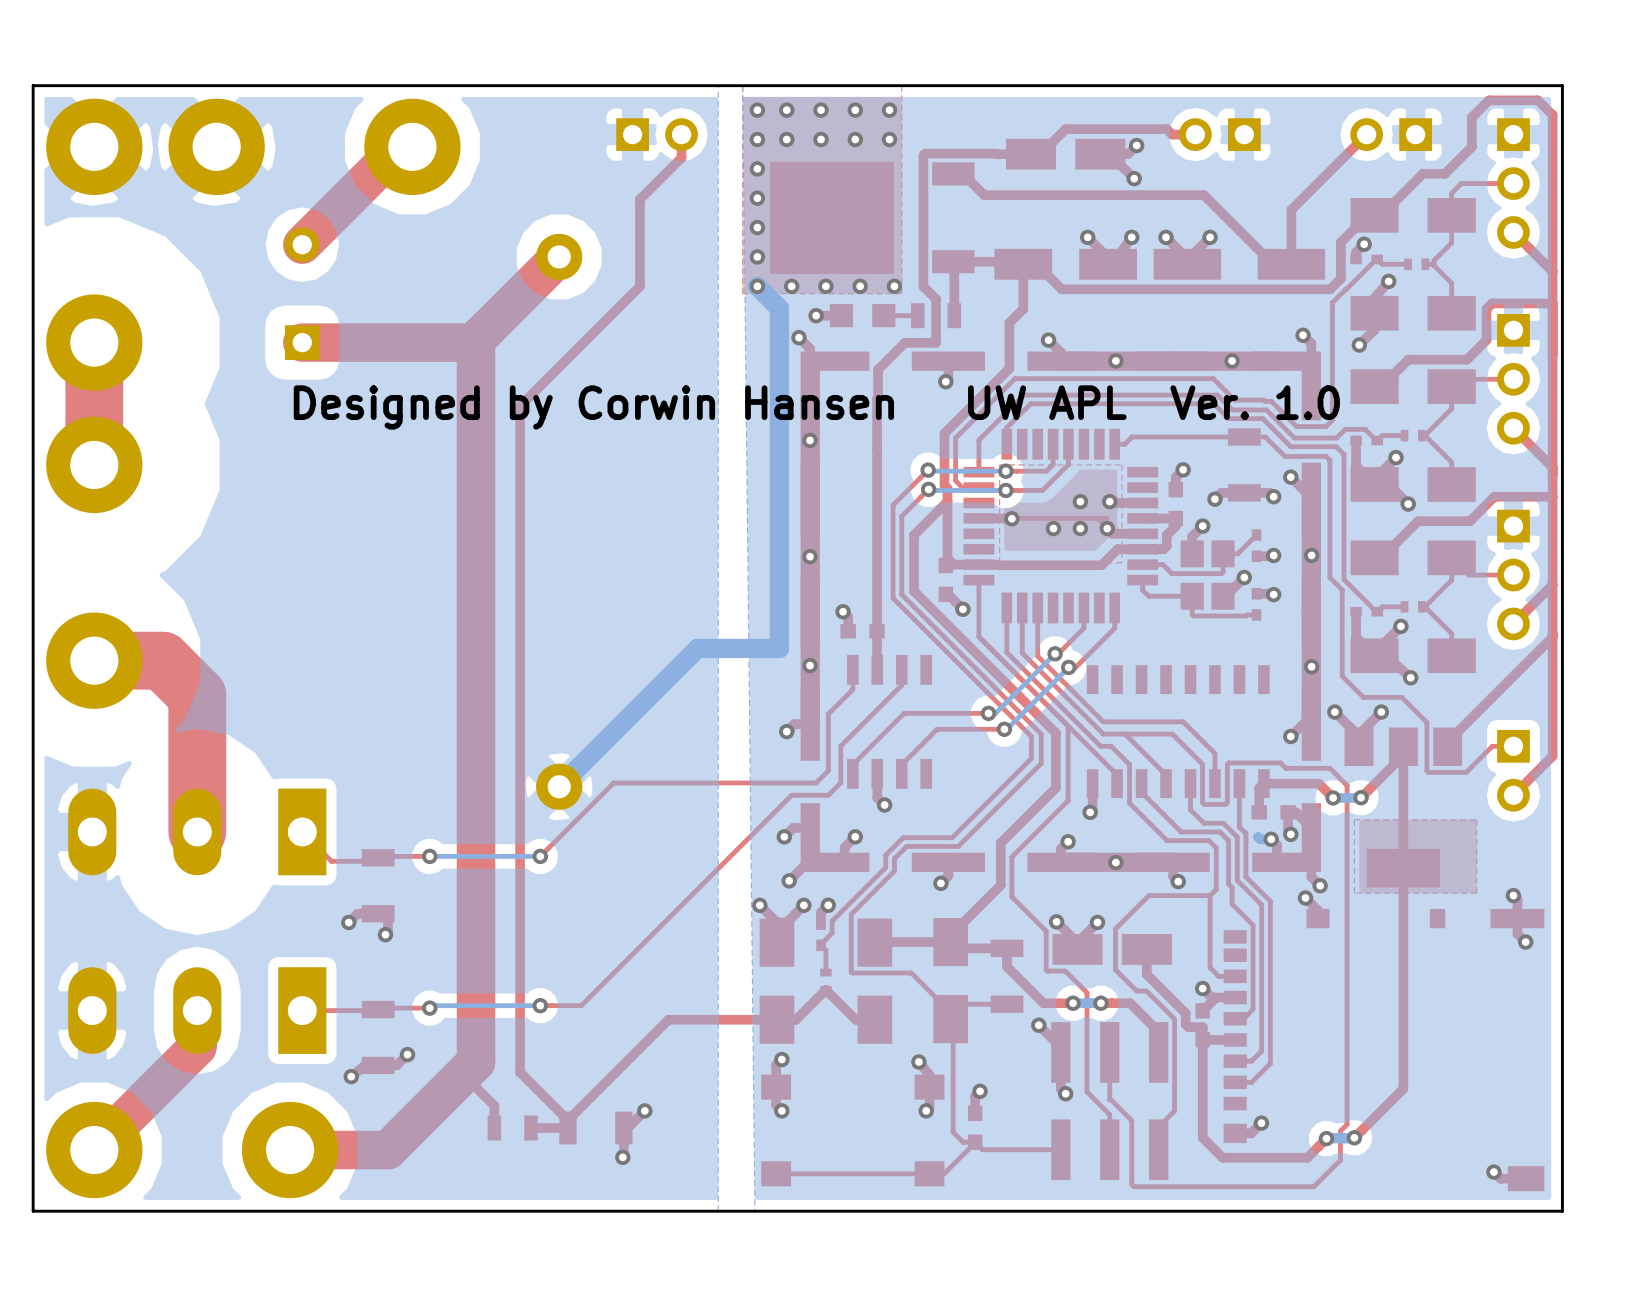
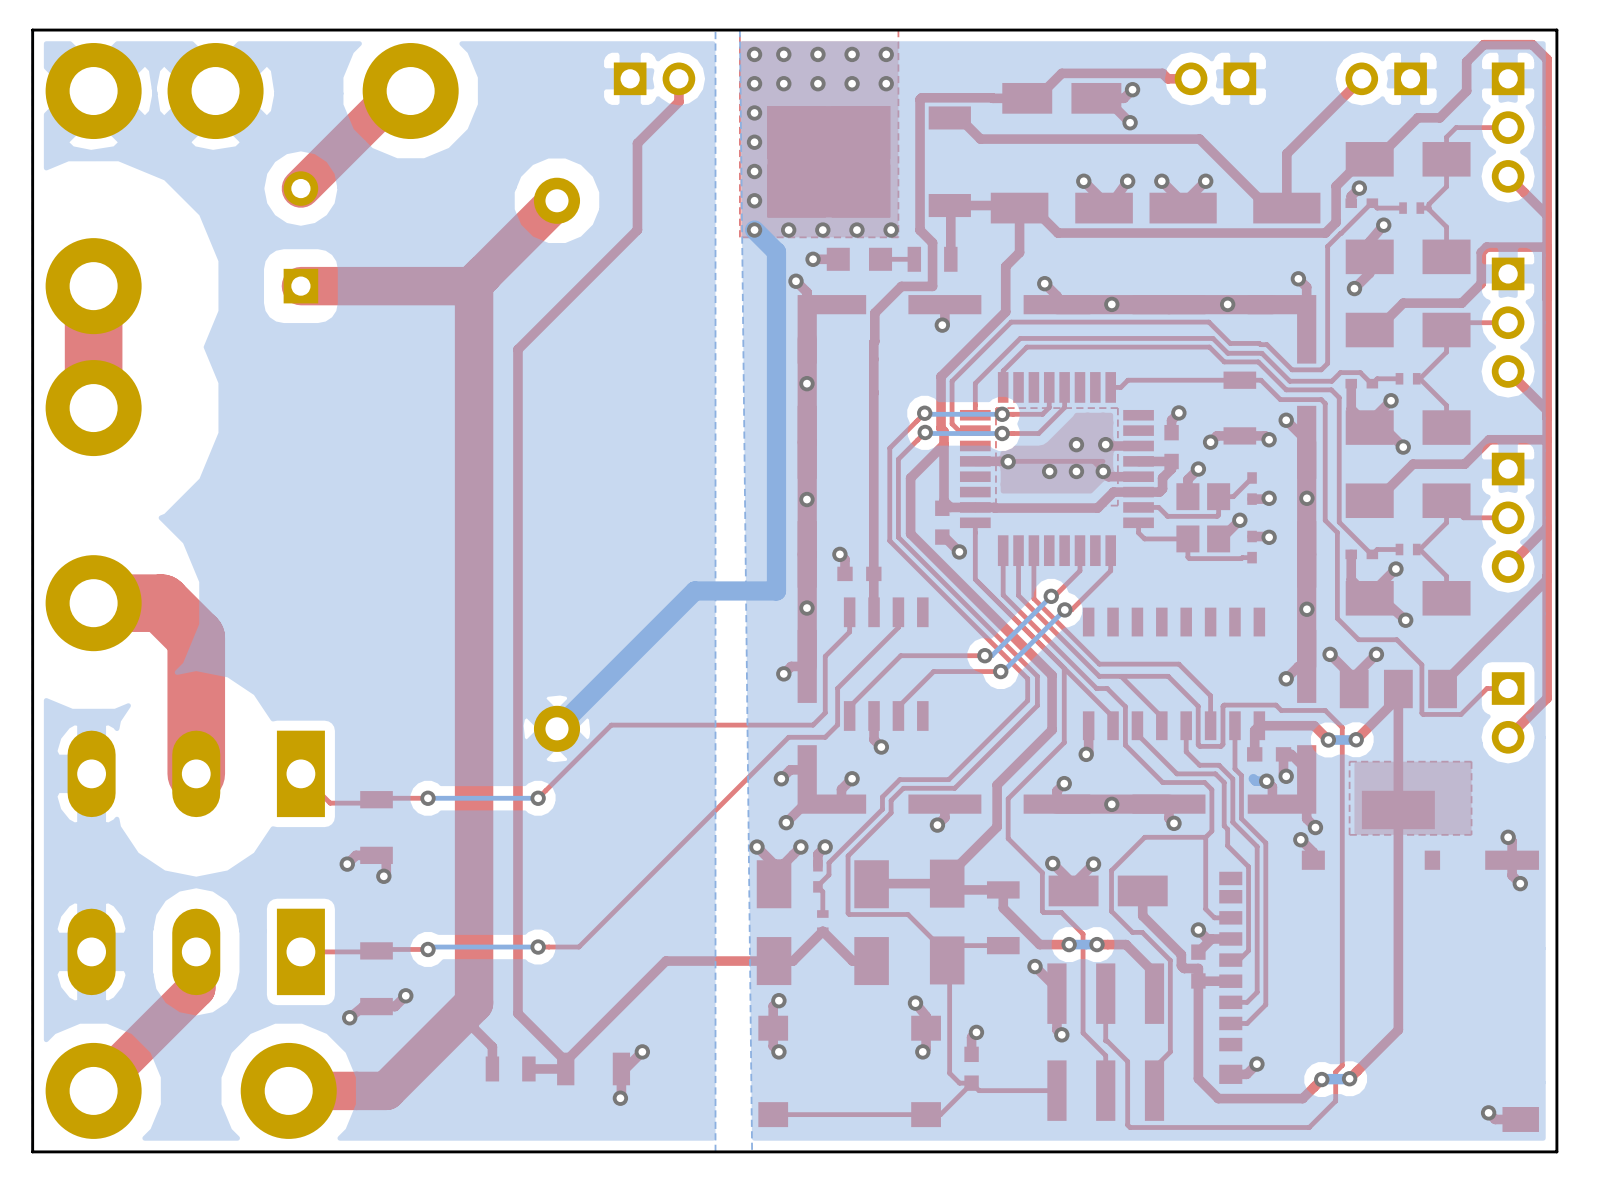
text: Designed by Corwin Hansen UW APL Ver. 1.0 (816, 407) -> none

